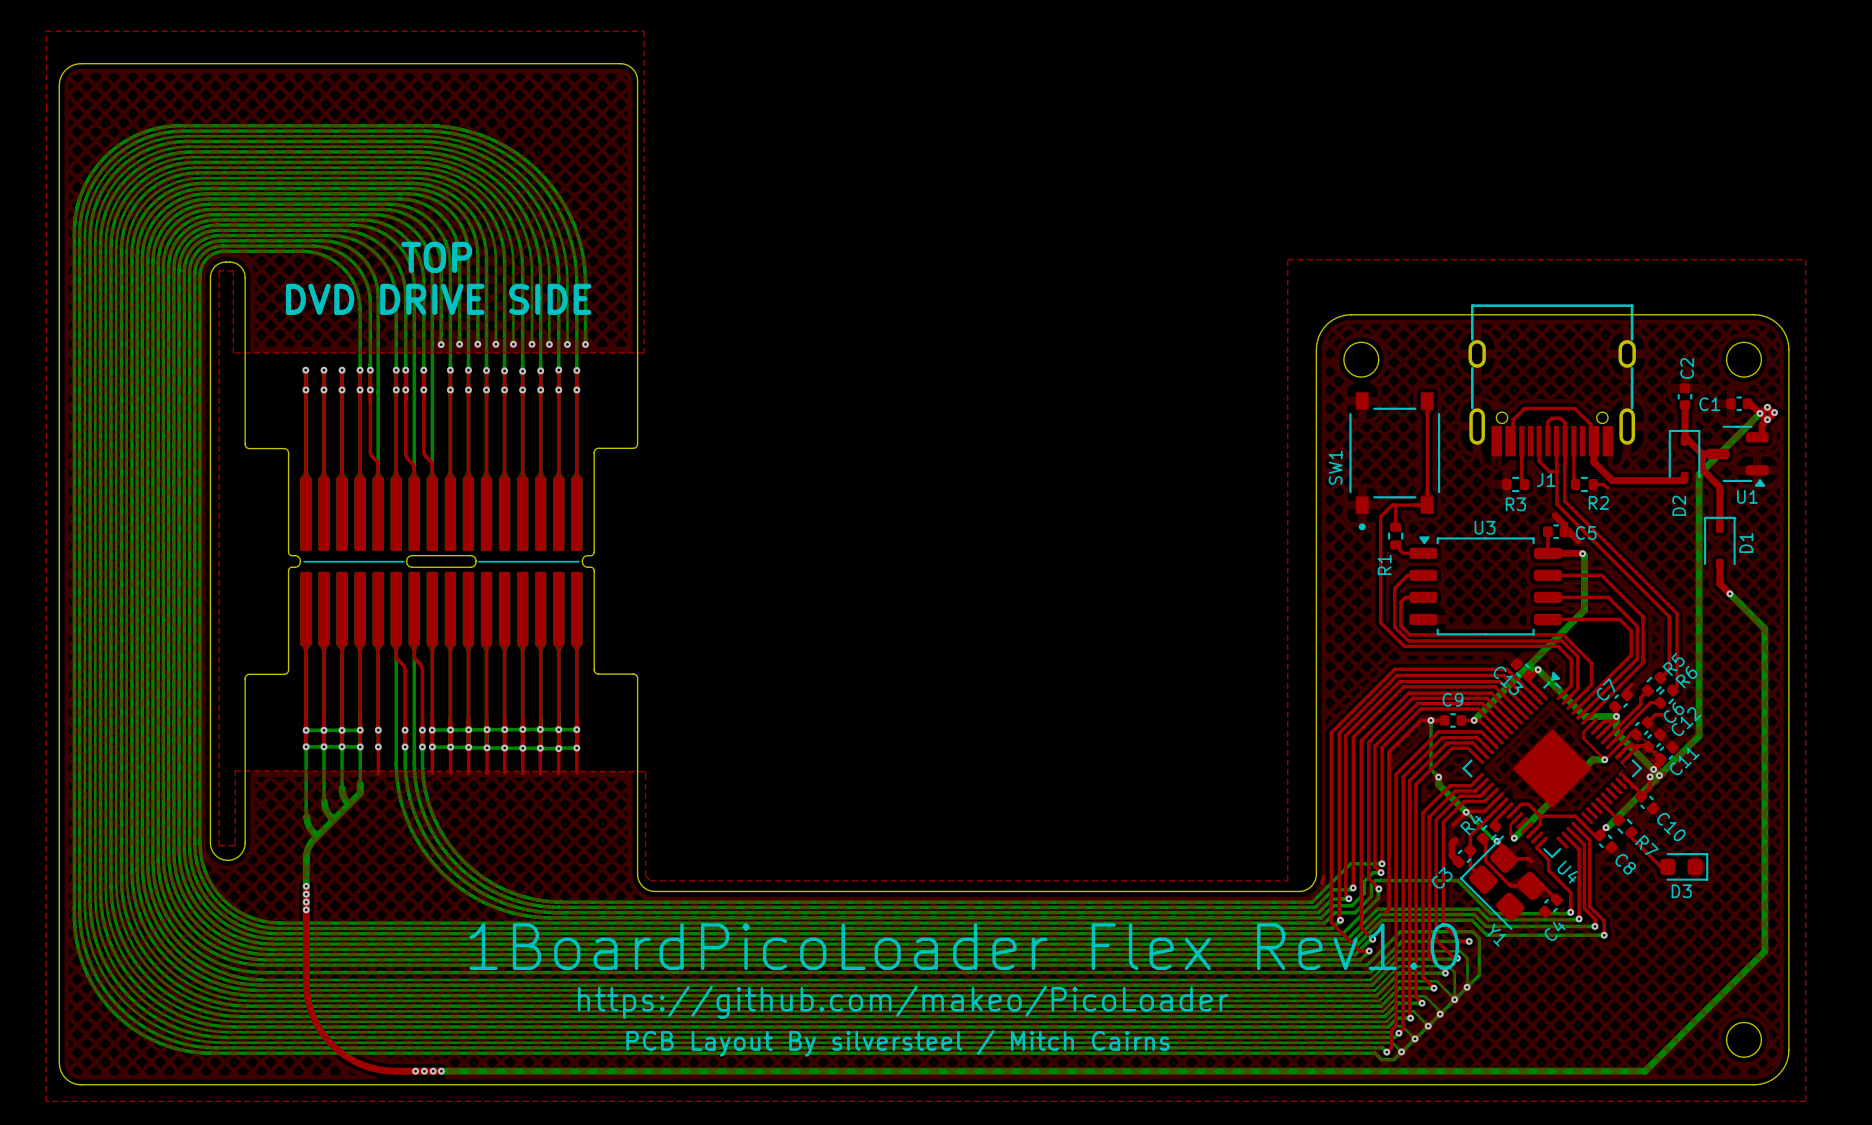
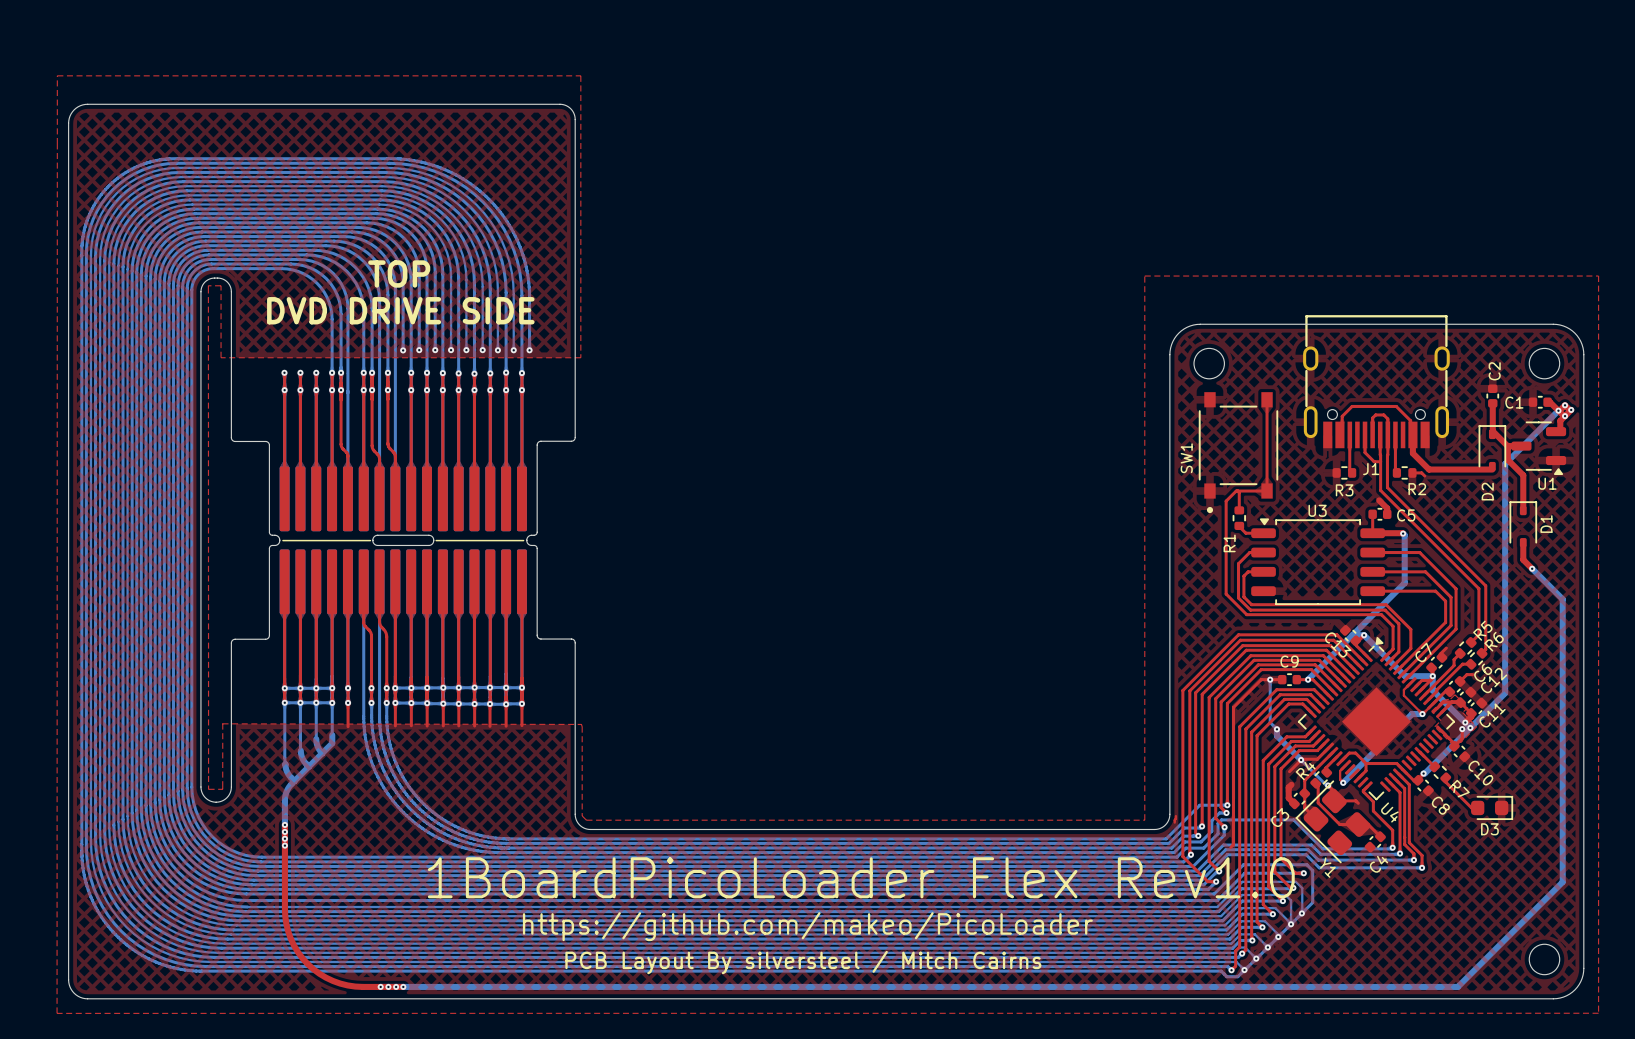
top track: (1564, 531) (1568, 531) (1577, 540) -> none

